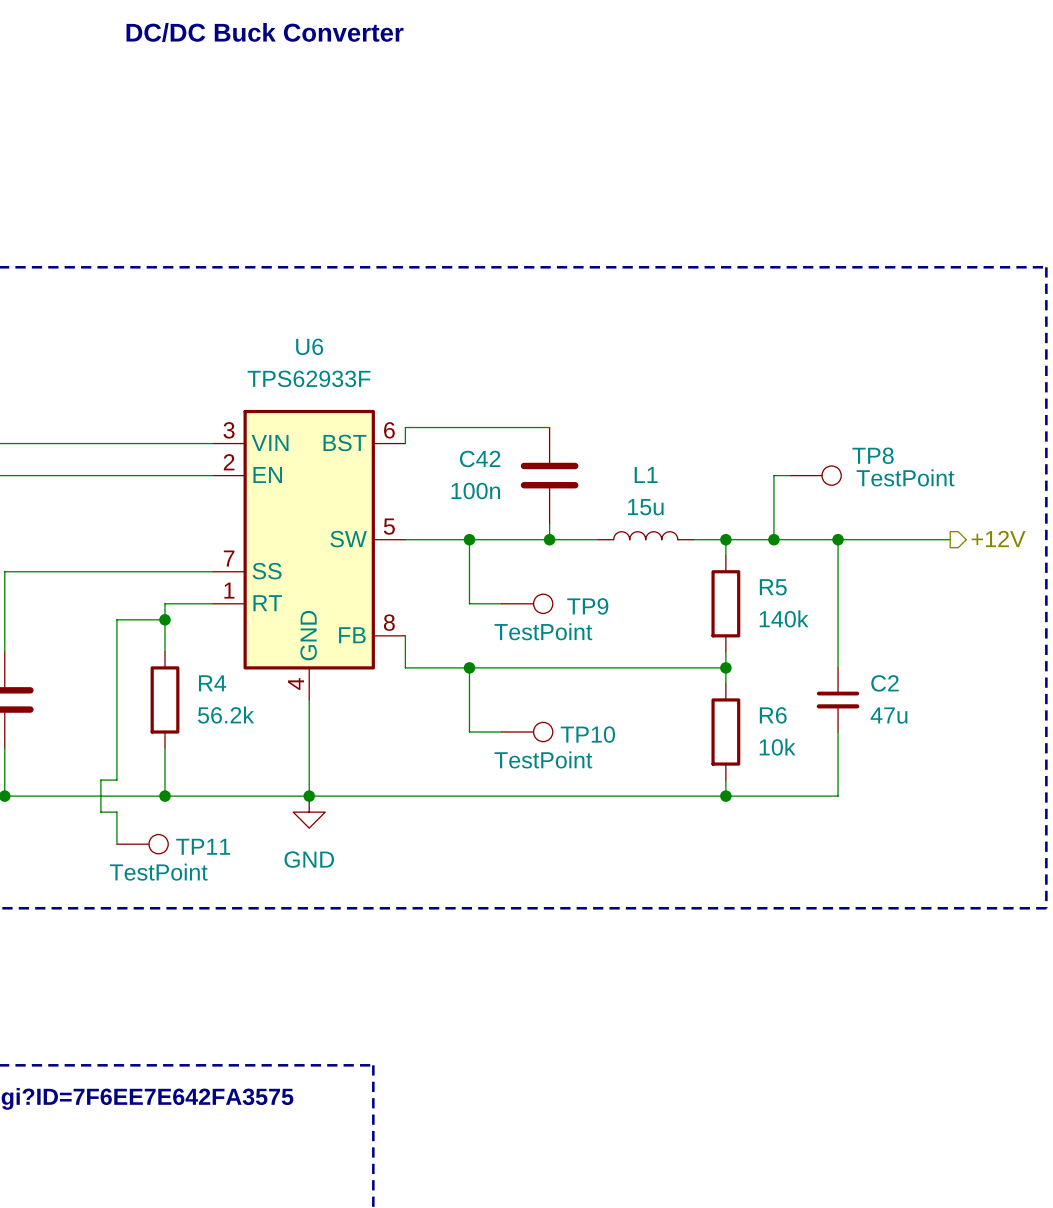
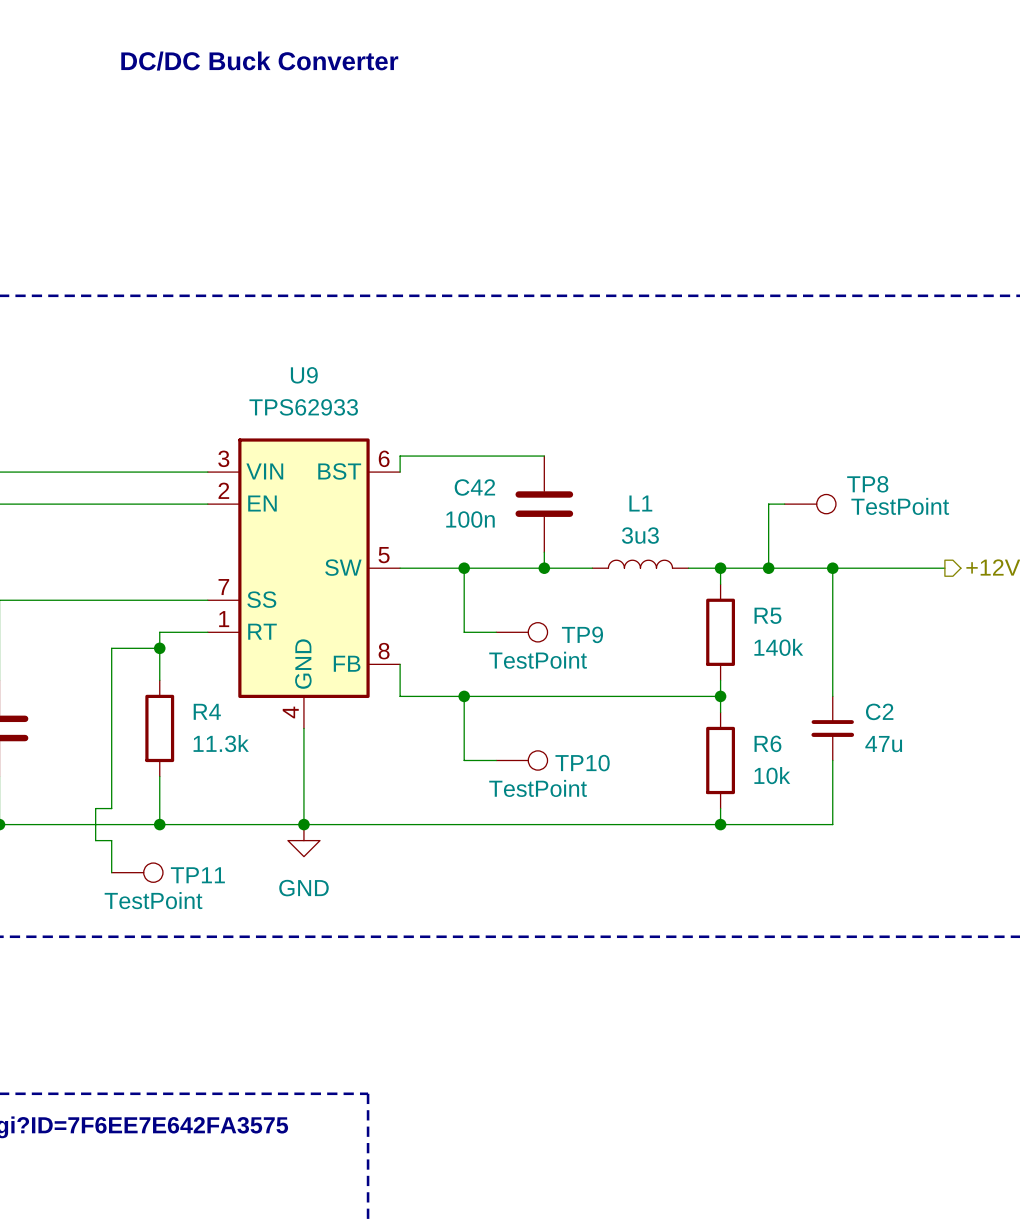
U6 name: U6 (309, 346) -> U9 (304, 375)
U6 value: TPS62933F (309, 378) -> TPS62933 (303, 407)
L1 value: 15u (645, 507) -> 3u3 (640, 535)
R4 value: 56.2k (226, 715) -> 11.3k (221, 743)

